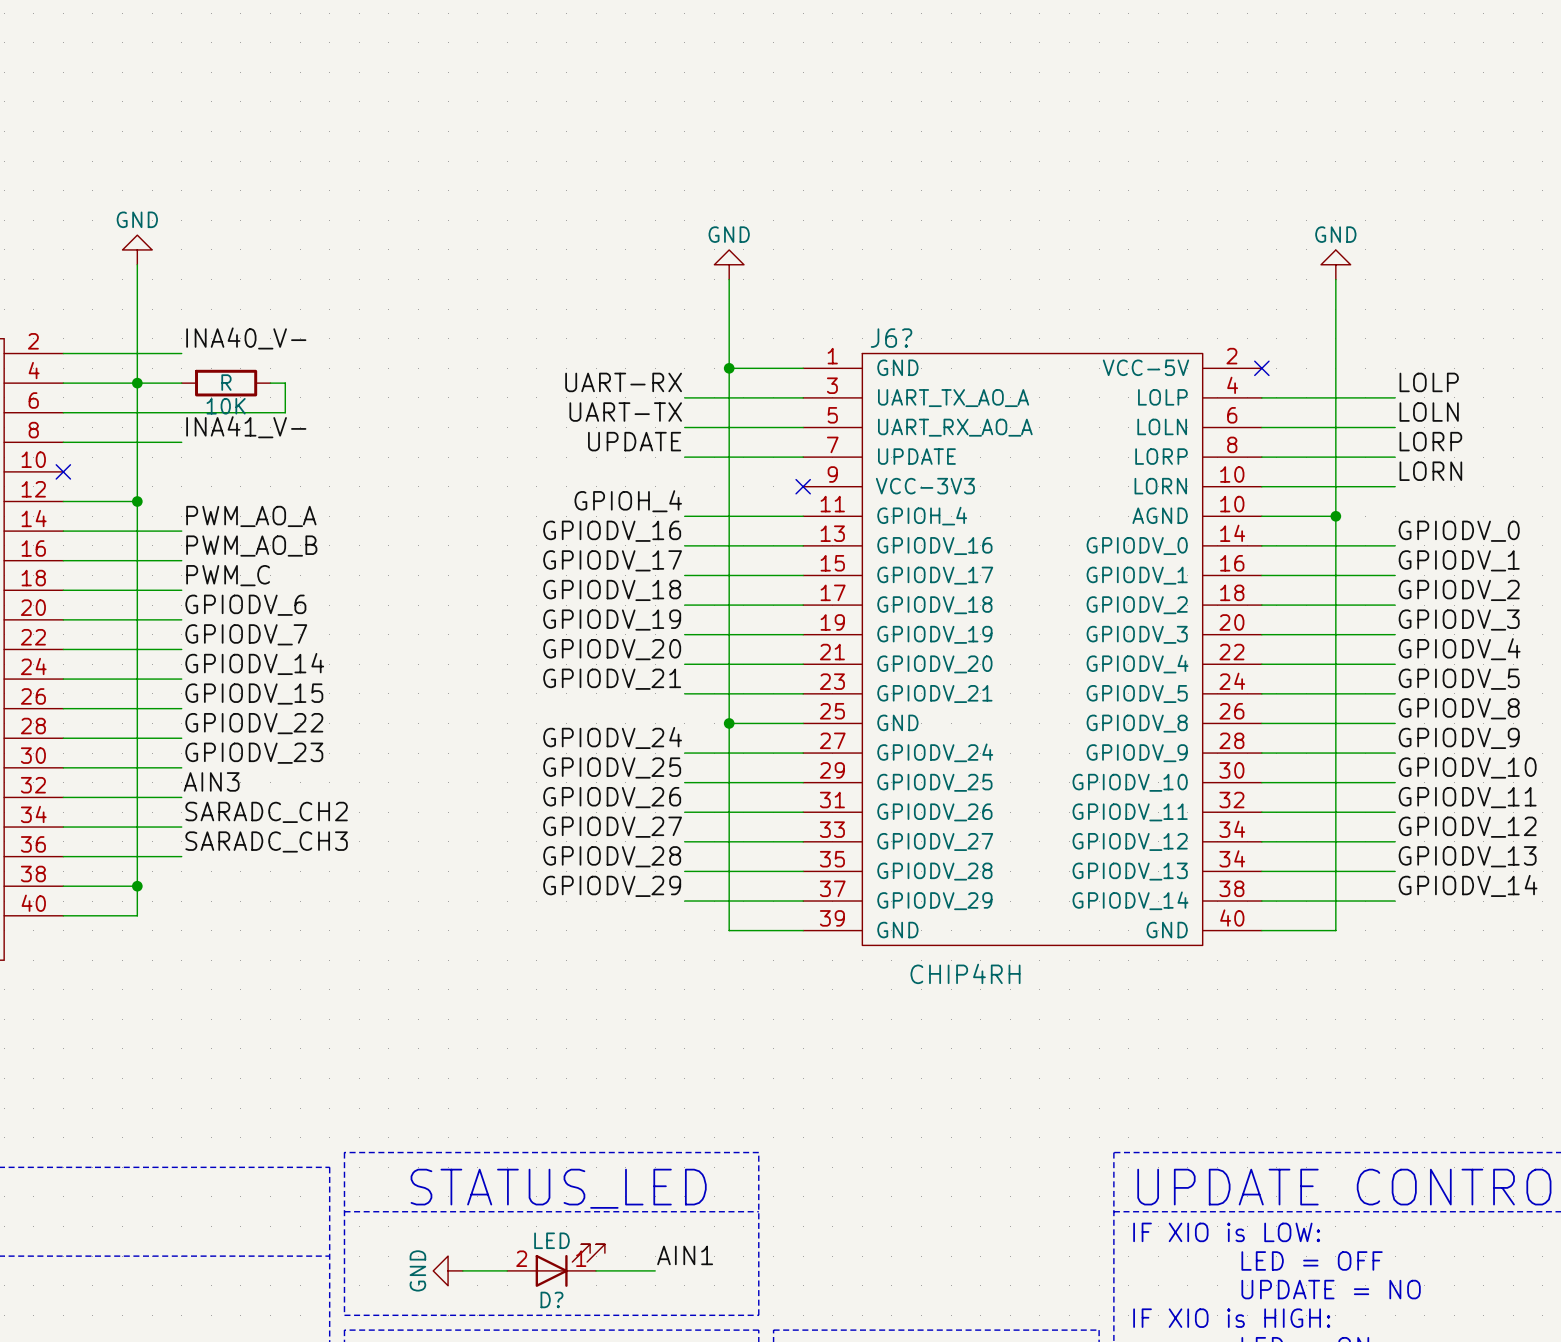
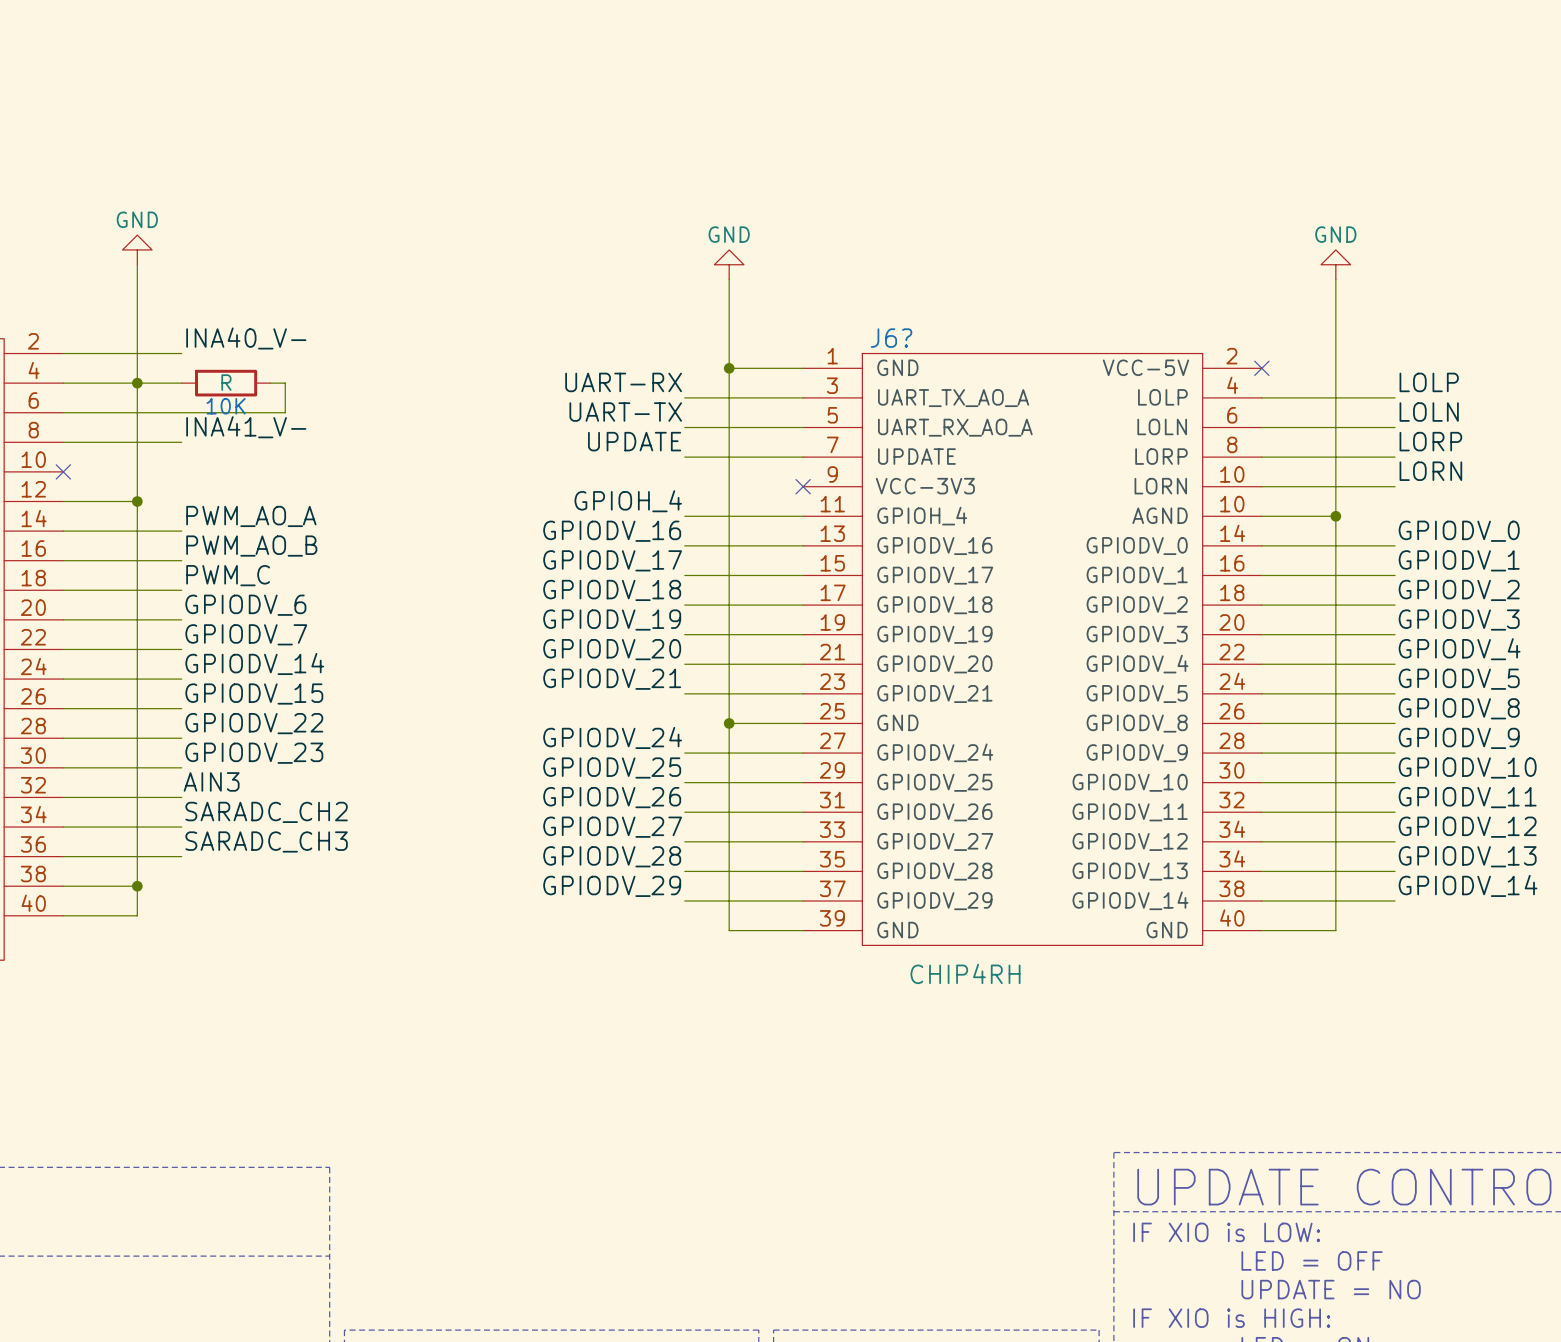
line: (344, 1152) (344, 1315) (758, 1315) (758, 1152) (344, 1152) -> none
text: STATUS_LED (558, 1188) -> none
line: (344, 1211) (758, 1211) -> none
label: AIN1 (685, 1255) -> none
D?: LED (556, 1265) -> none
power symbol: GND (448, 1270) -> none
wire: (462, 1270) (507, 1270) -> none
wire: (596, 1270) (655, 1270) -> none

